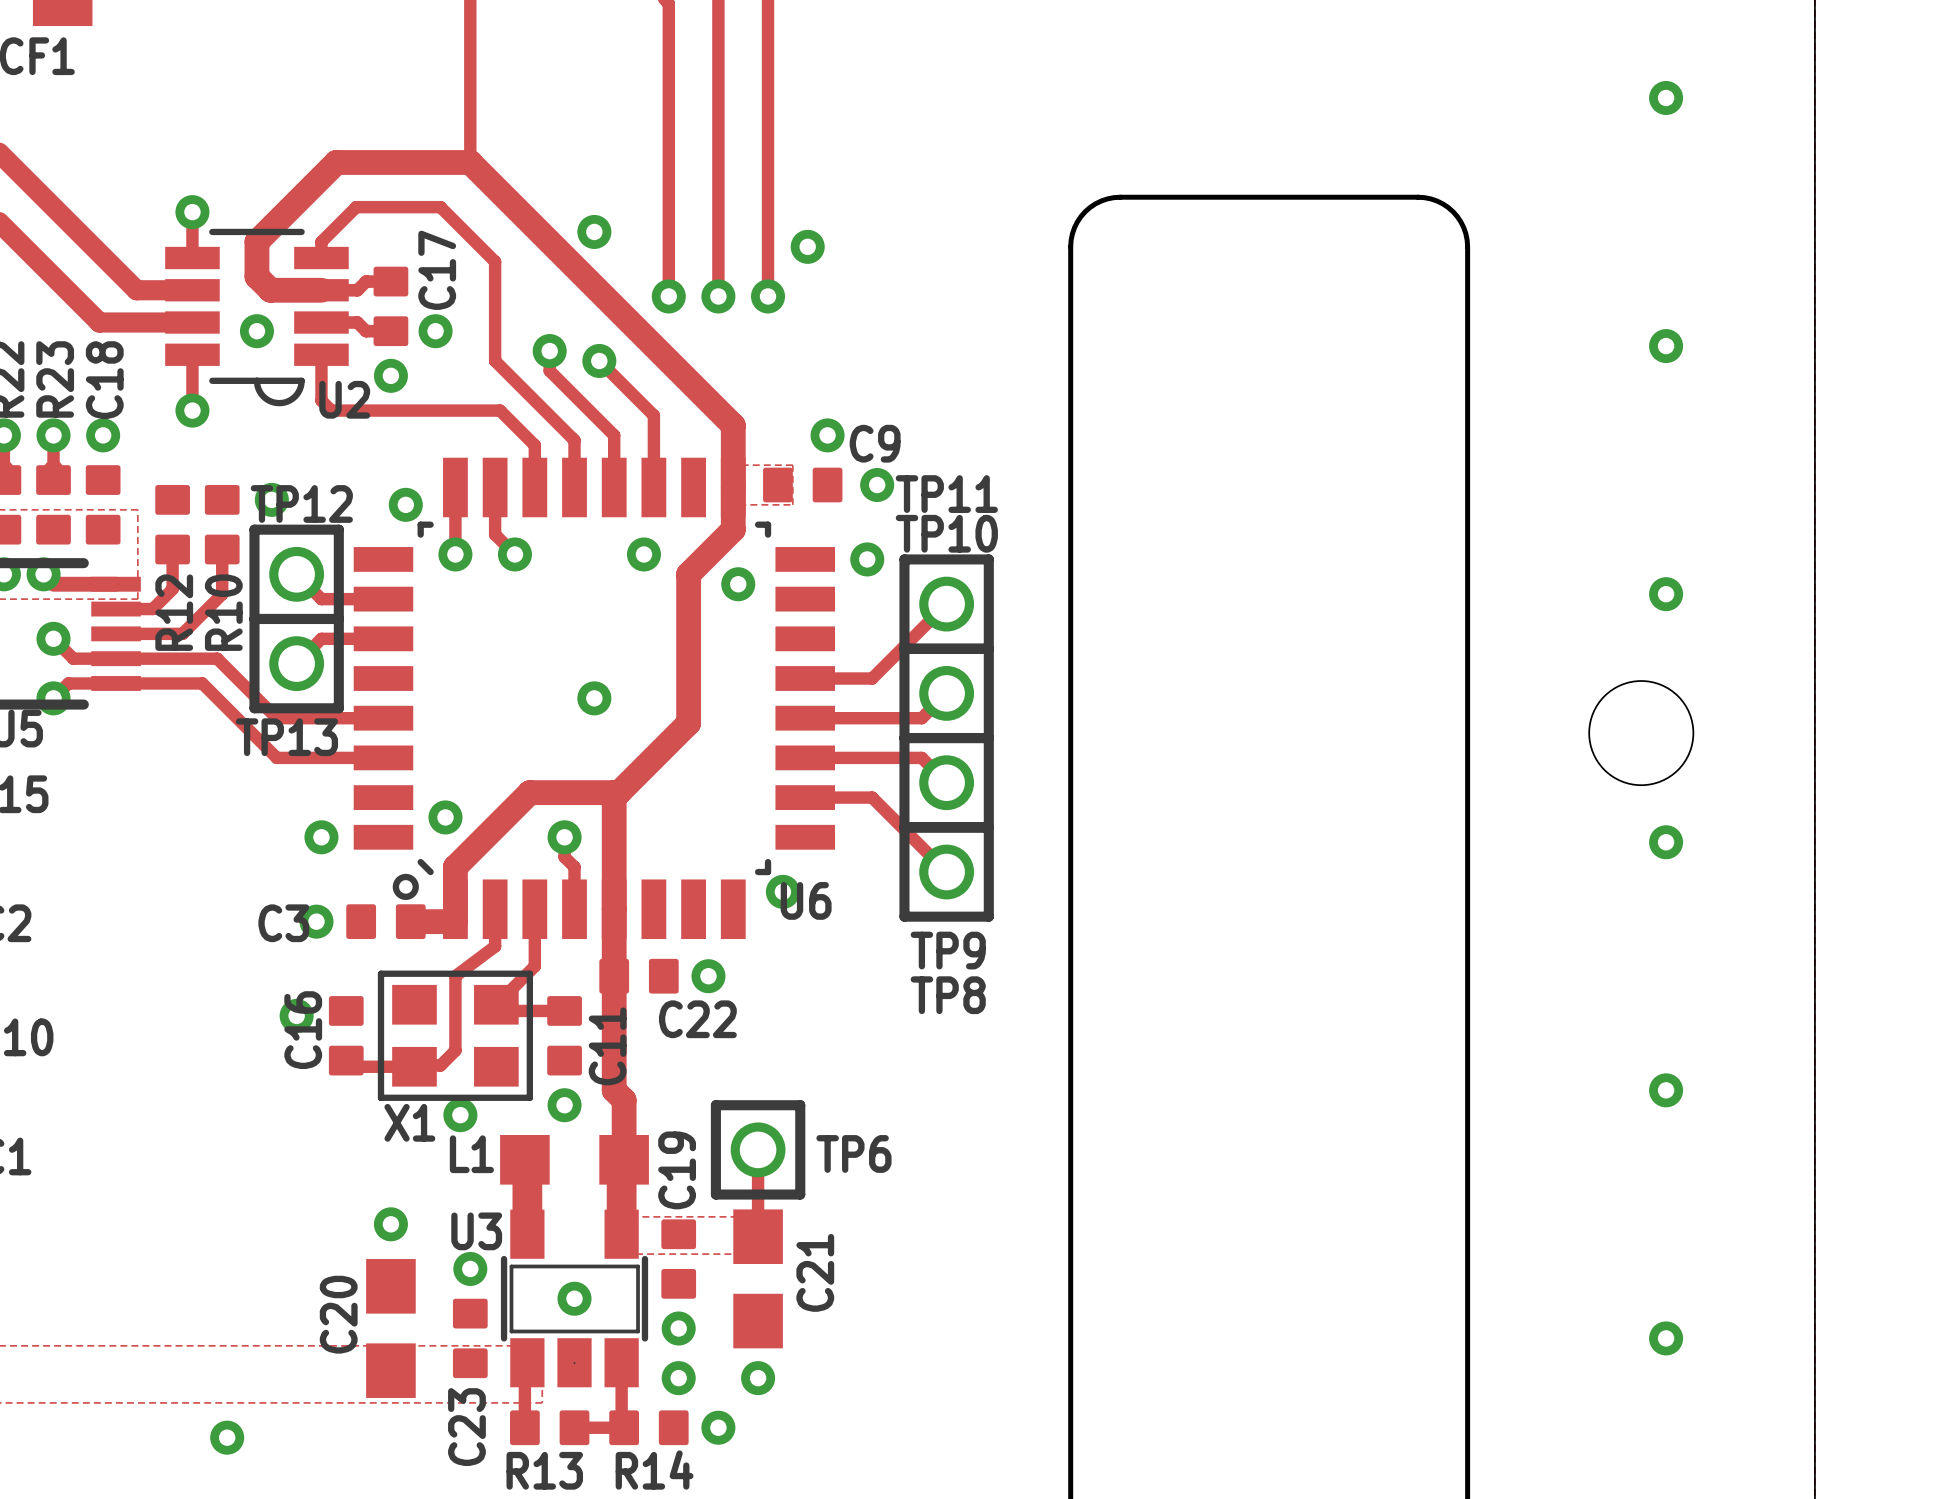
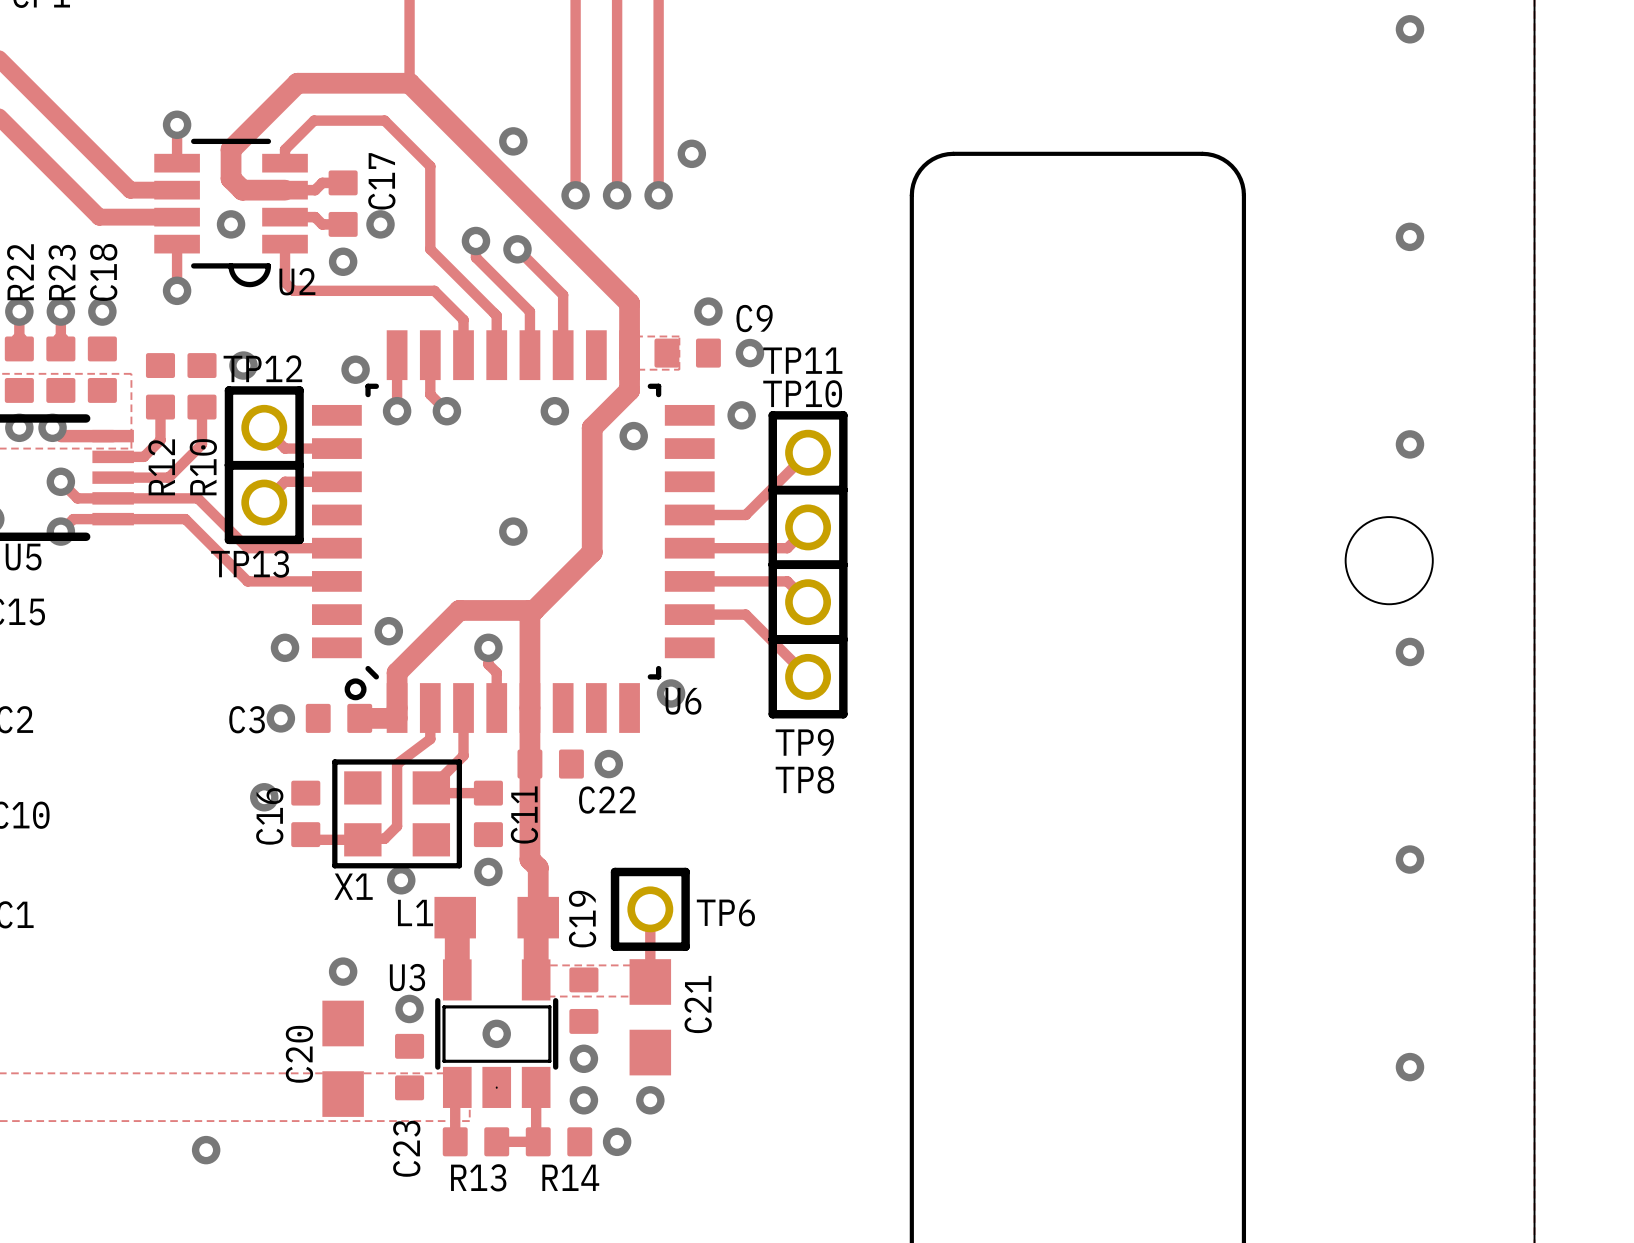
board edge: (1070, 296) (1071, 240) (1077, 222) (1085, 211) (1095, 203) (1107, 198) (1120, 197) (1418, 197) (1430, 198) (1448, 207) (1457, 216) (1463, 227) (1467, 246) (1467, 296) -> (911, 195) (915, 179) (924, 165) (937, 156) (953, 153) (1207, 154) (1223, 159) (1235, 170) (1240, 179) (1243, 195)

